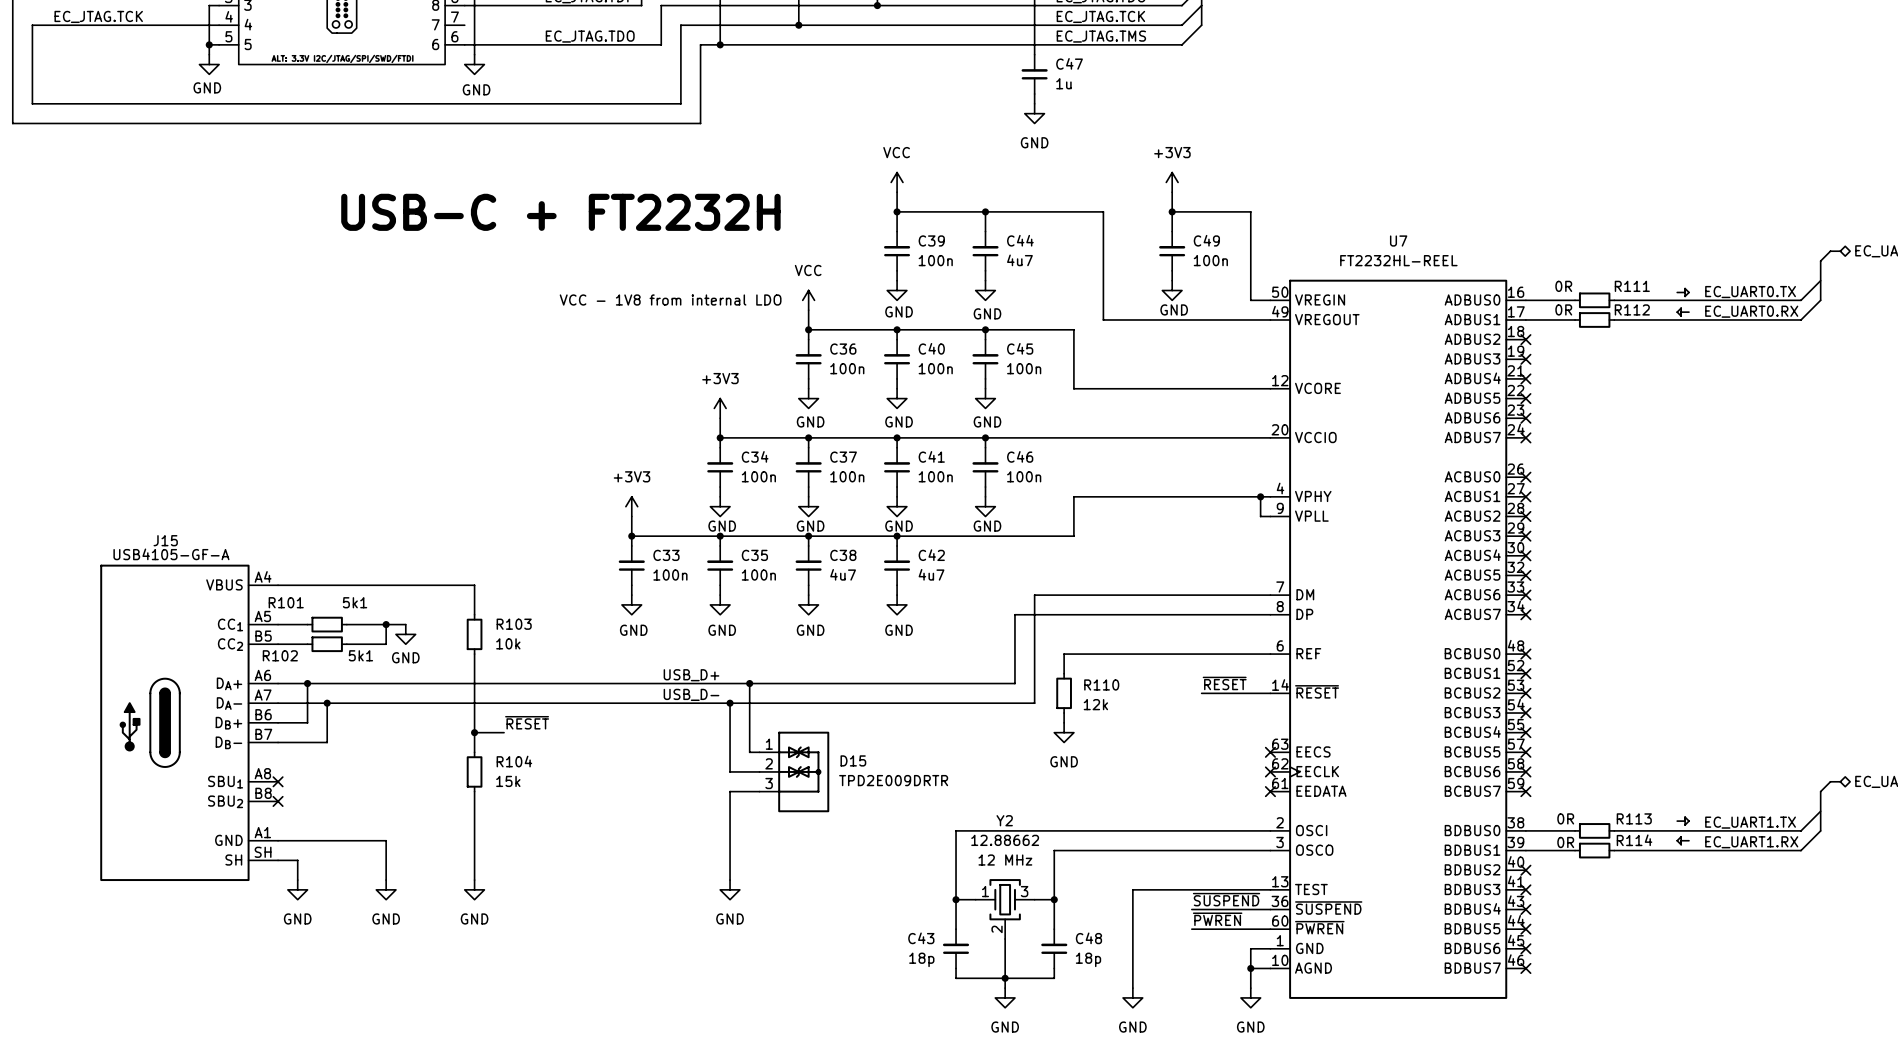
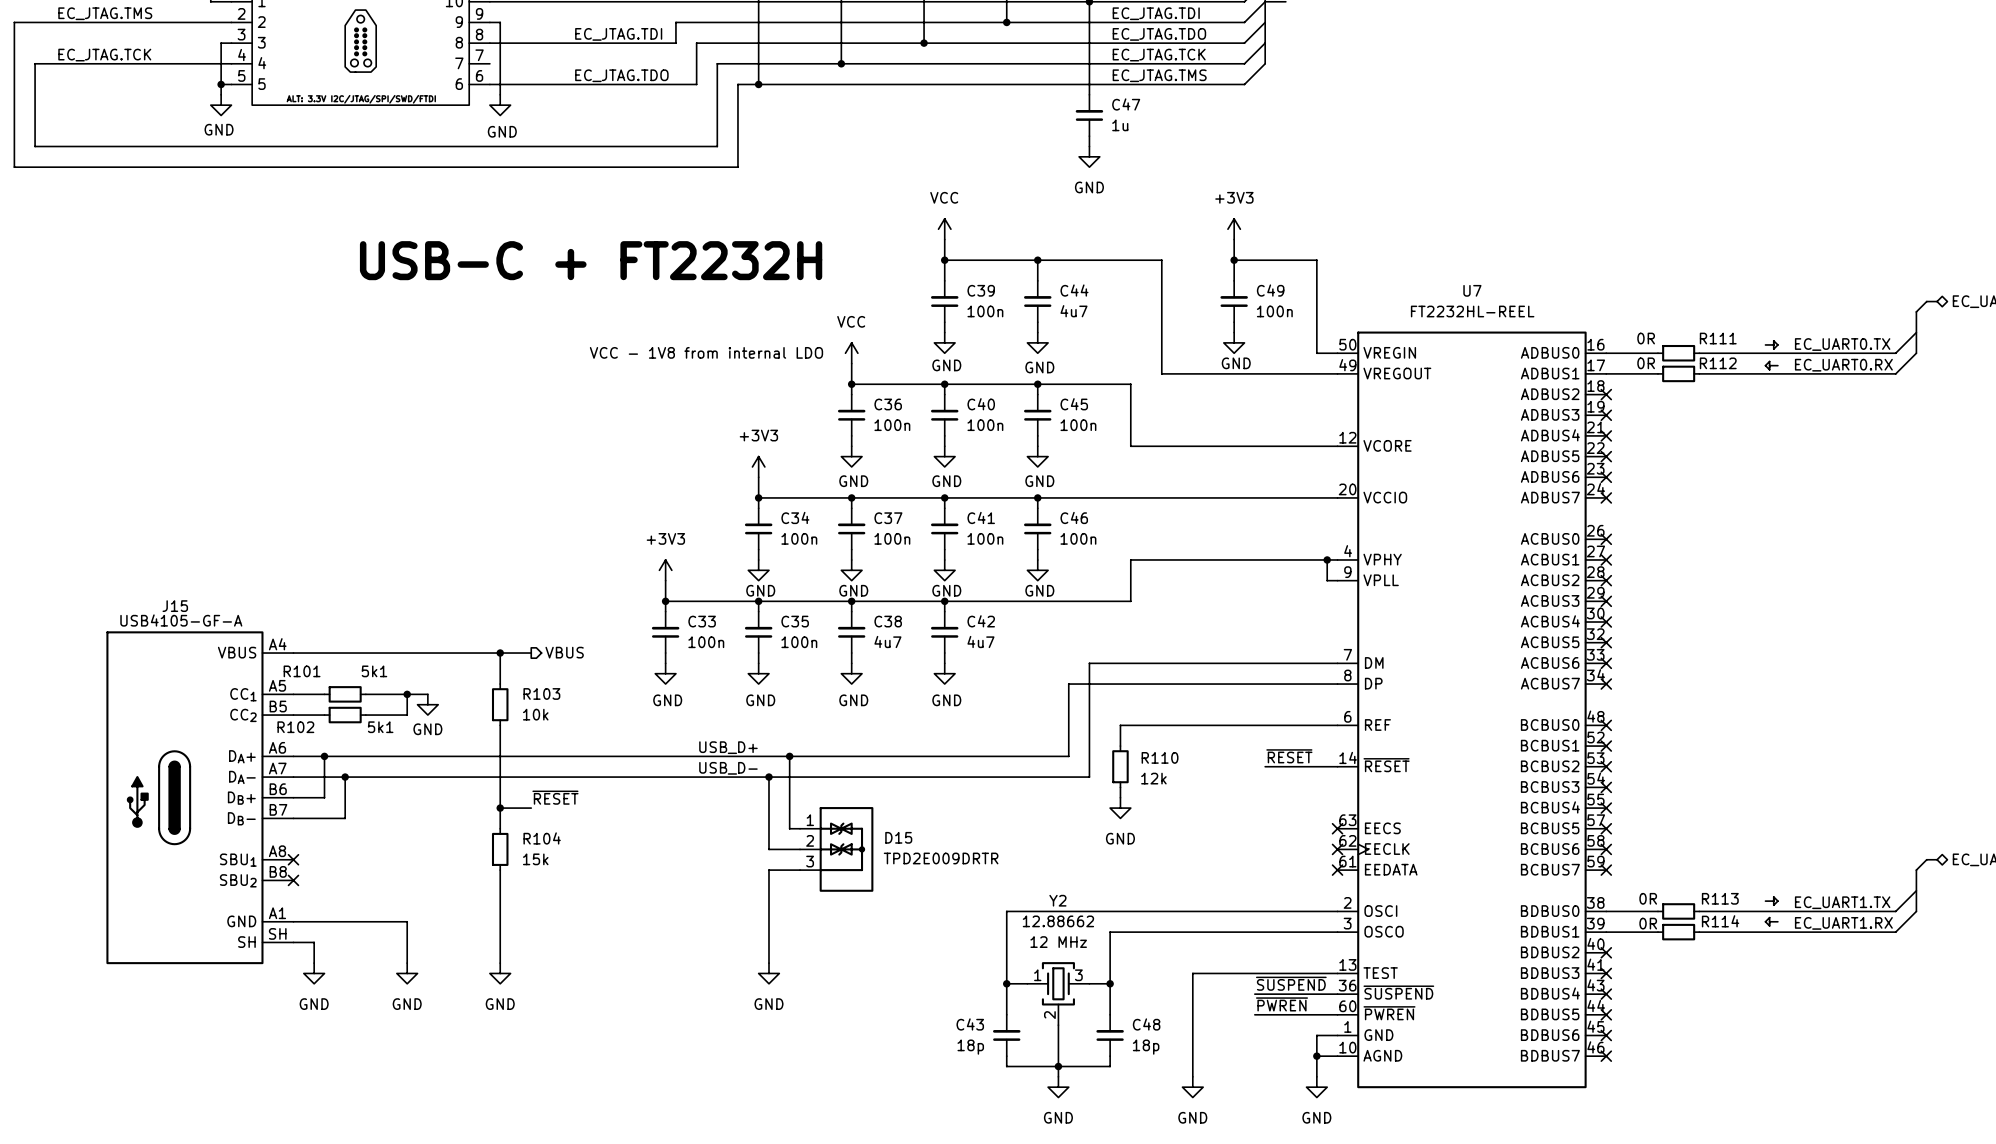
hierarchical label: none -> VBUS (564, 652)
wire: none -> (500, 653) (531, 653)
junction: none -> (500, 653)

